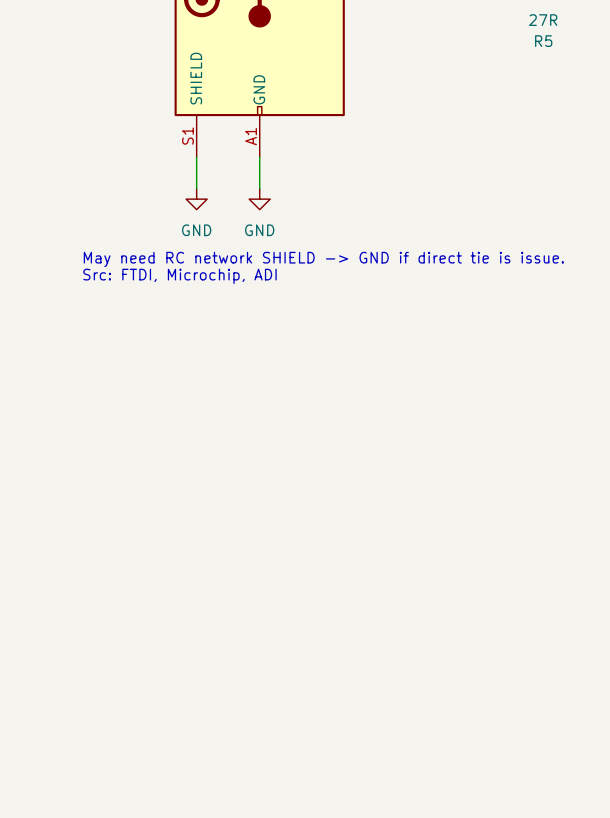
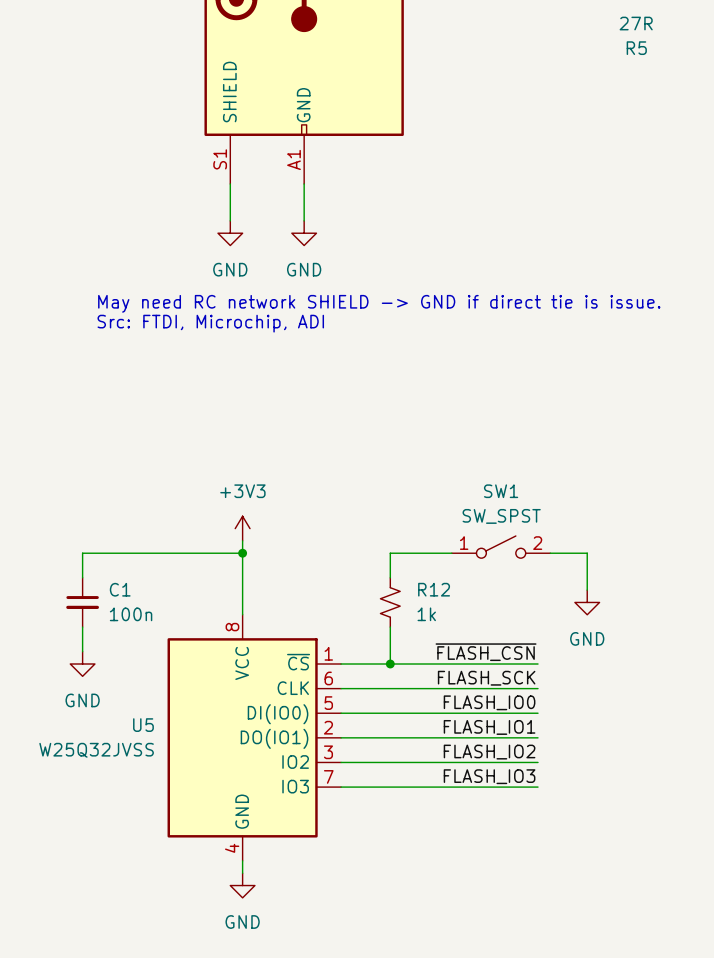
power symbol: none -> +3V3 (242, 528)
wire: none -> (242, 540) (242, 614)
SW1: none -> SW_SPST (501, 547)
wire: none -> (242, 553) (82, 553) (82, 577)
junction: none -> (242, 553)
wire: none -> (451, 553) (390, 553) (390, 577)
wire: none -> (550, 553) (587, 553) (587, 590)
C1: none -> 100n (82, 602)
R12: none -> 1k (390, 602)
power symbol: none -> GND (587, 602)
wire: none -> (82, 627) (82, 651)
wire: none -> (390, 627) (390, 664)
label: none -> ~{FLASH_CSN} (486, 652)
power symbol: none -> GND (82, 664)
wire: none -> (341, 664) (538, 664)
junction: none -> (390, 664)
label: none -> FLASH_SCK (486, 678)
wire: none -> (341, 688) (538, 688)
label: none -> FLASH_IO0 (489, 702)
wire: none -> (341, 713) (538, 713)
label: none -> FLASH_IO1 (489, 727)
U5: none -> W25Q32JVSS (254, 737)
wire: none -> (341, 737) (538, 737)
label: none -> FLASH_IO2 (489, 752)
wire: none -> (341, 762) (538, 762)
label: none -> FLASH_IO3 (489, 776)
wire: none -> (341, 787) (538, 787)
wire: none -> (242, 860) (242, 873)
power symbol: none -> GND (242, 885)

